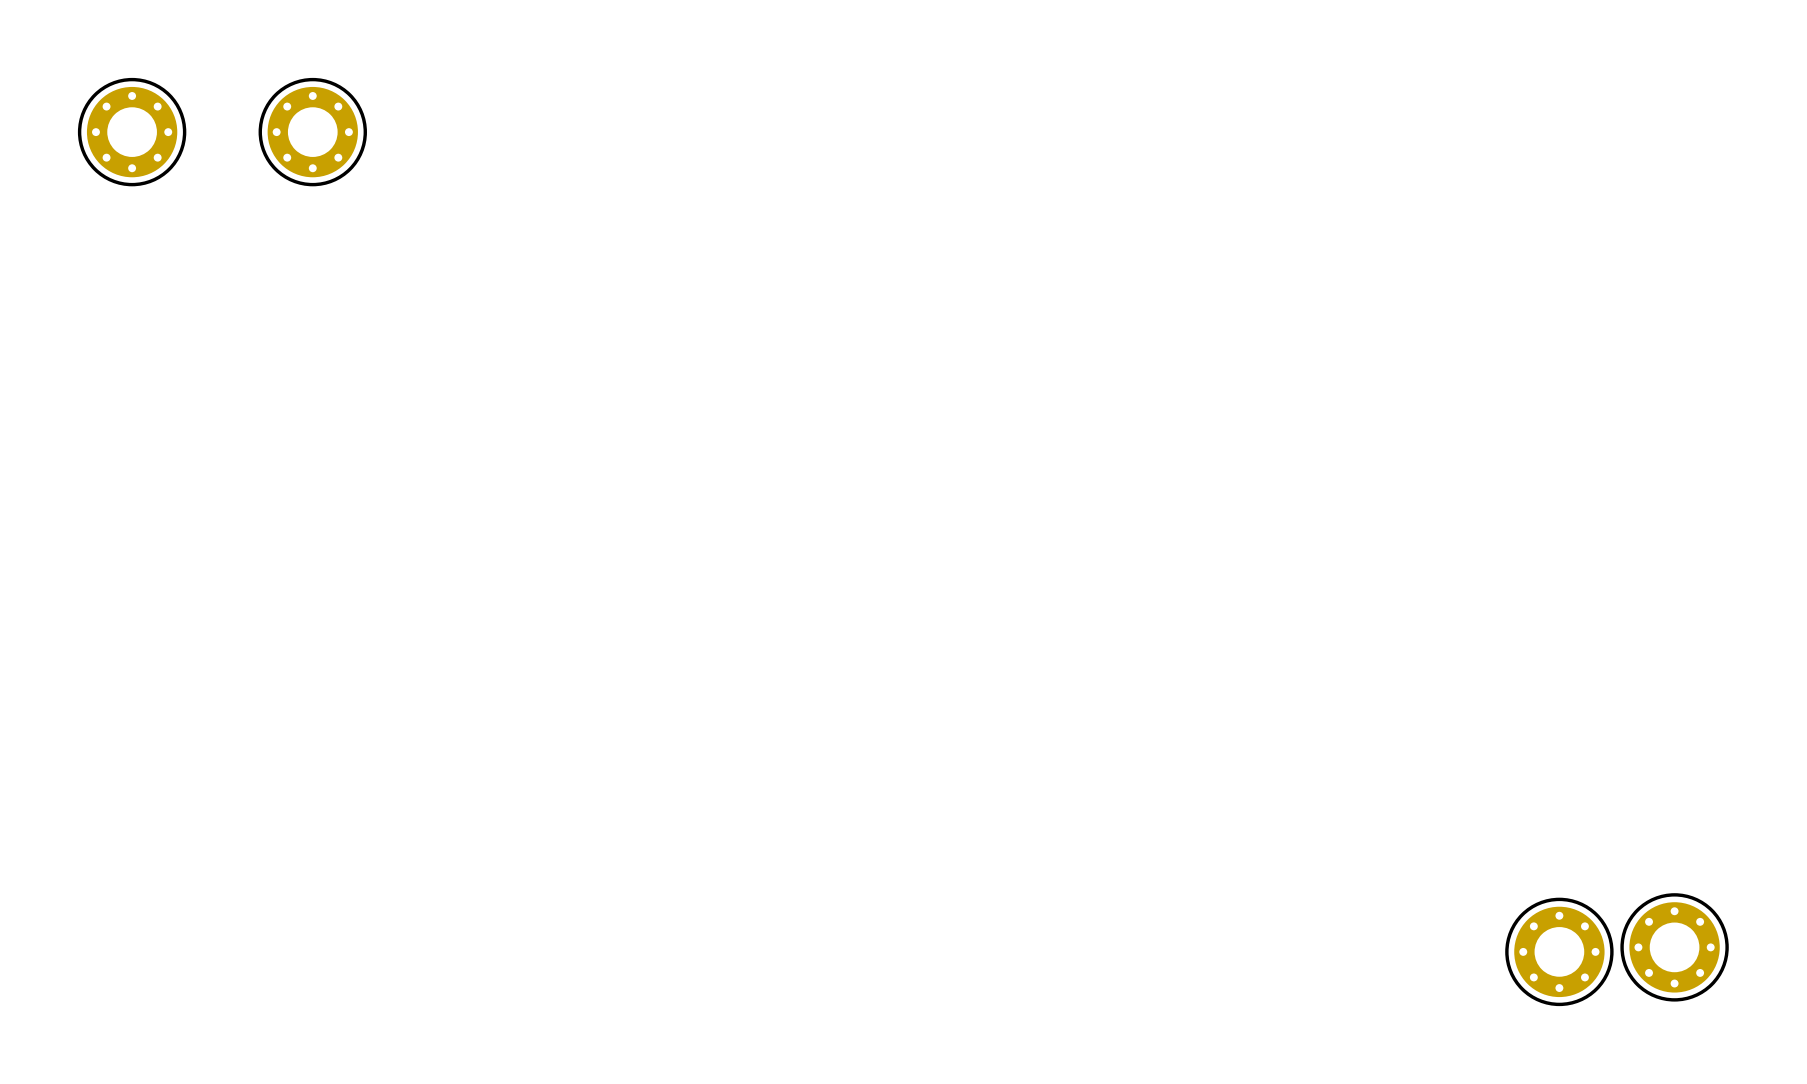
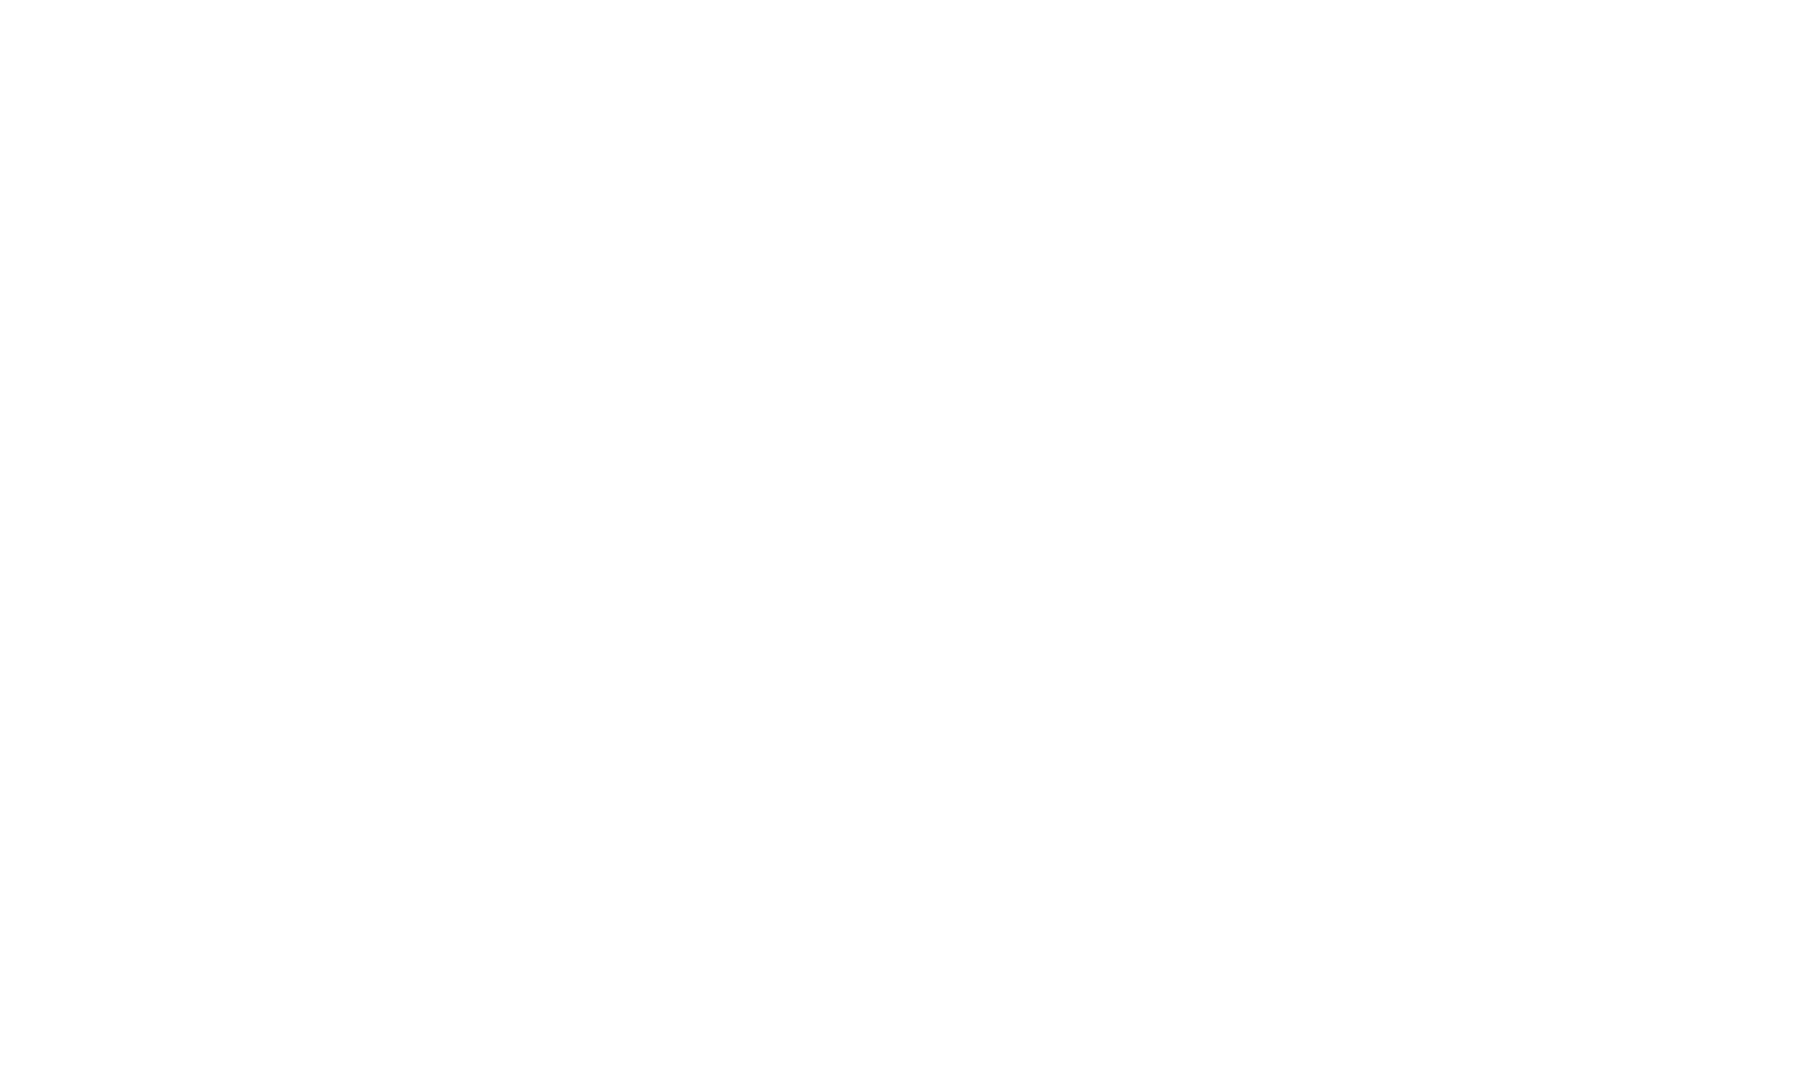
part: (132, 132) -> none
part: (312, 132) -> none
part: (1674, 947) -> none
part: (1559, 951) -> none

